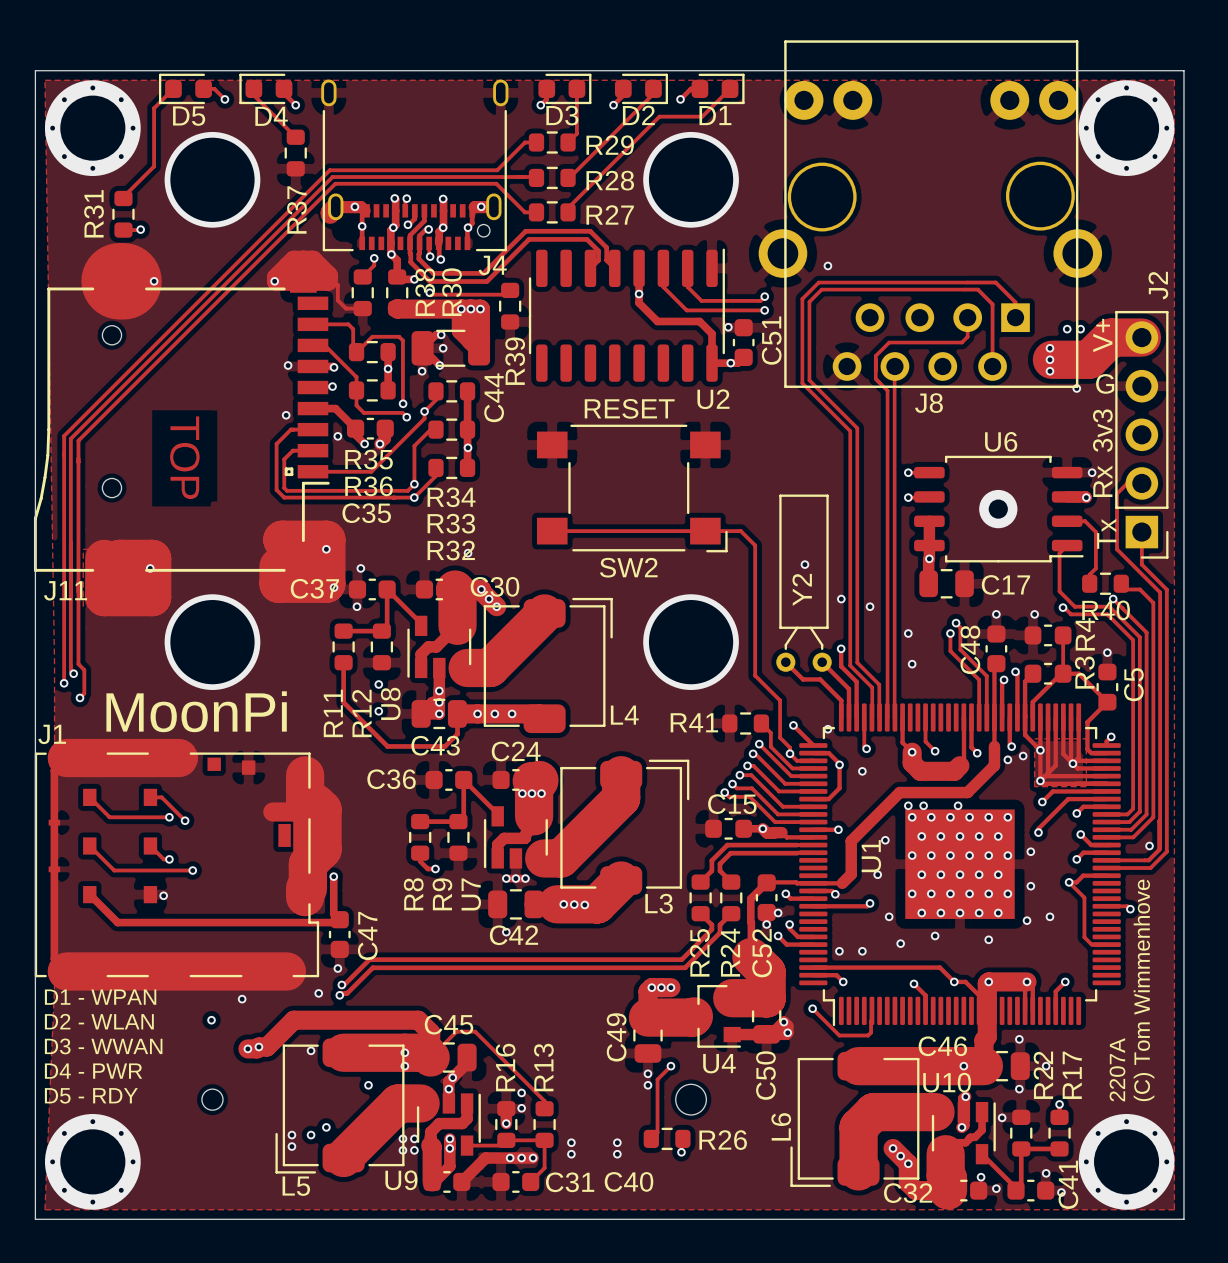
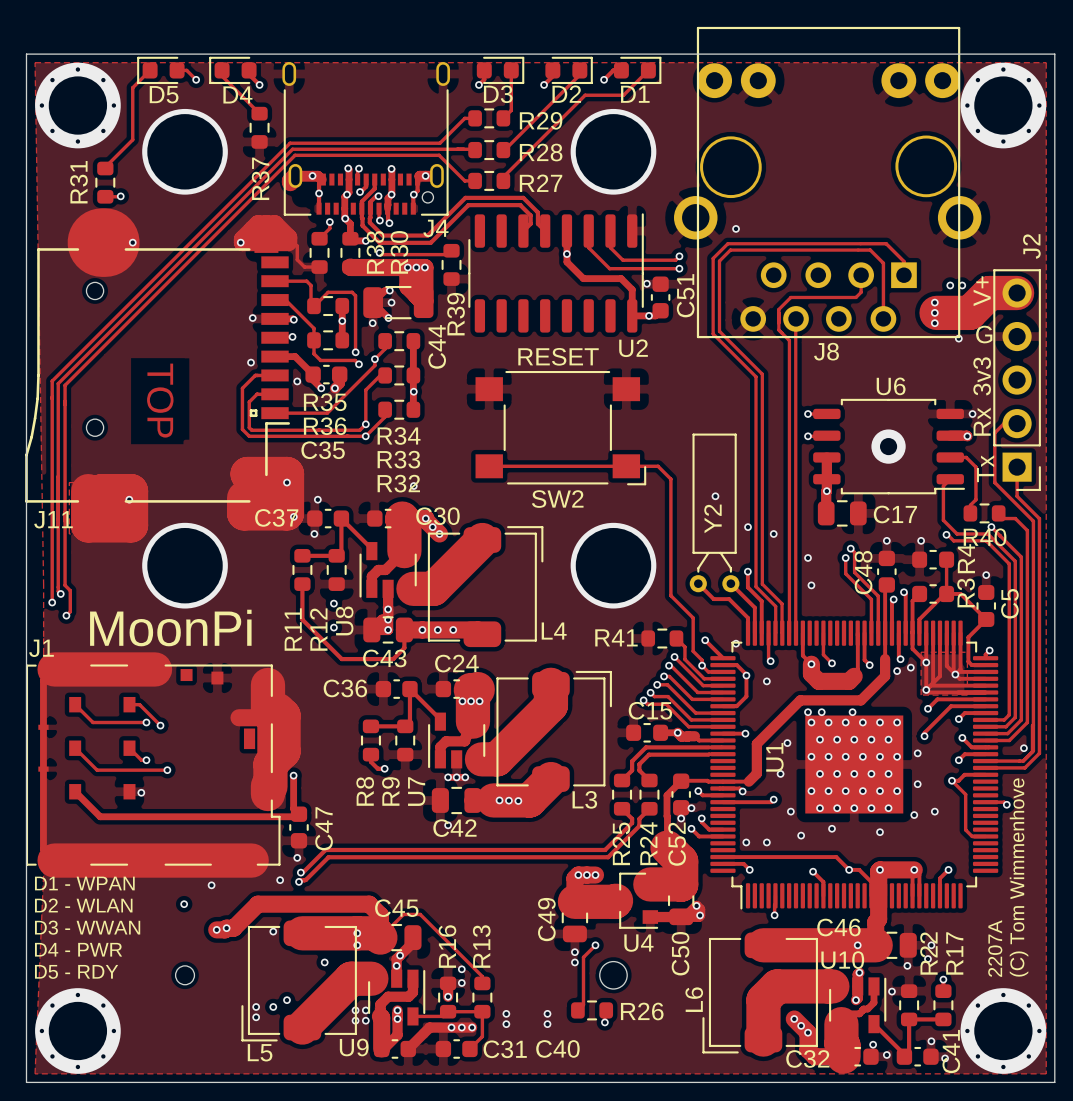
track: (812, 1008) (839, 1035) (868, 1035) (871, 1032) -> none
via position: (812, 1008) -> (774, 915)
via position: (1019, 1039) -> (927, 959)

